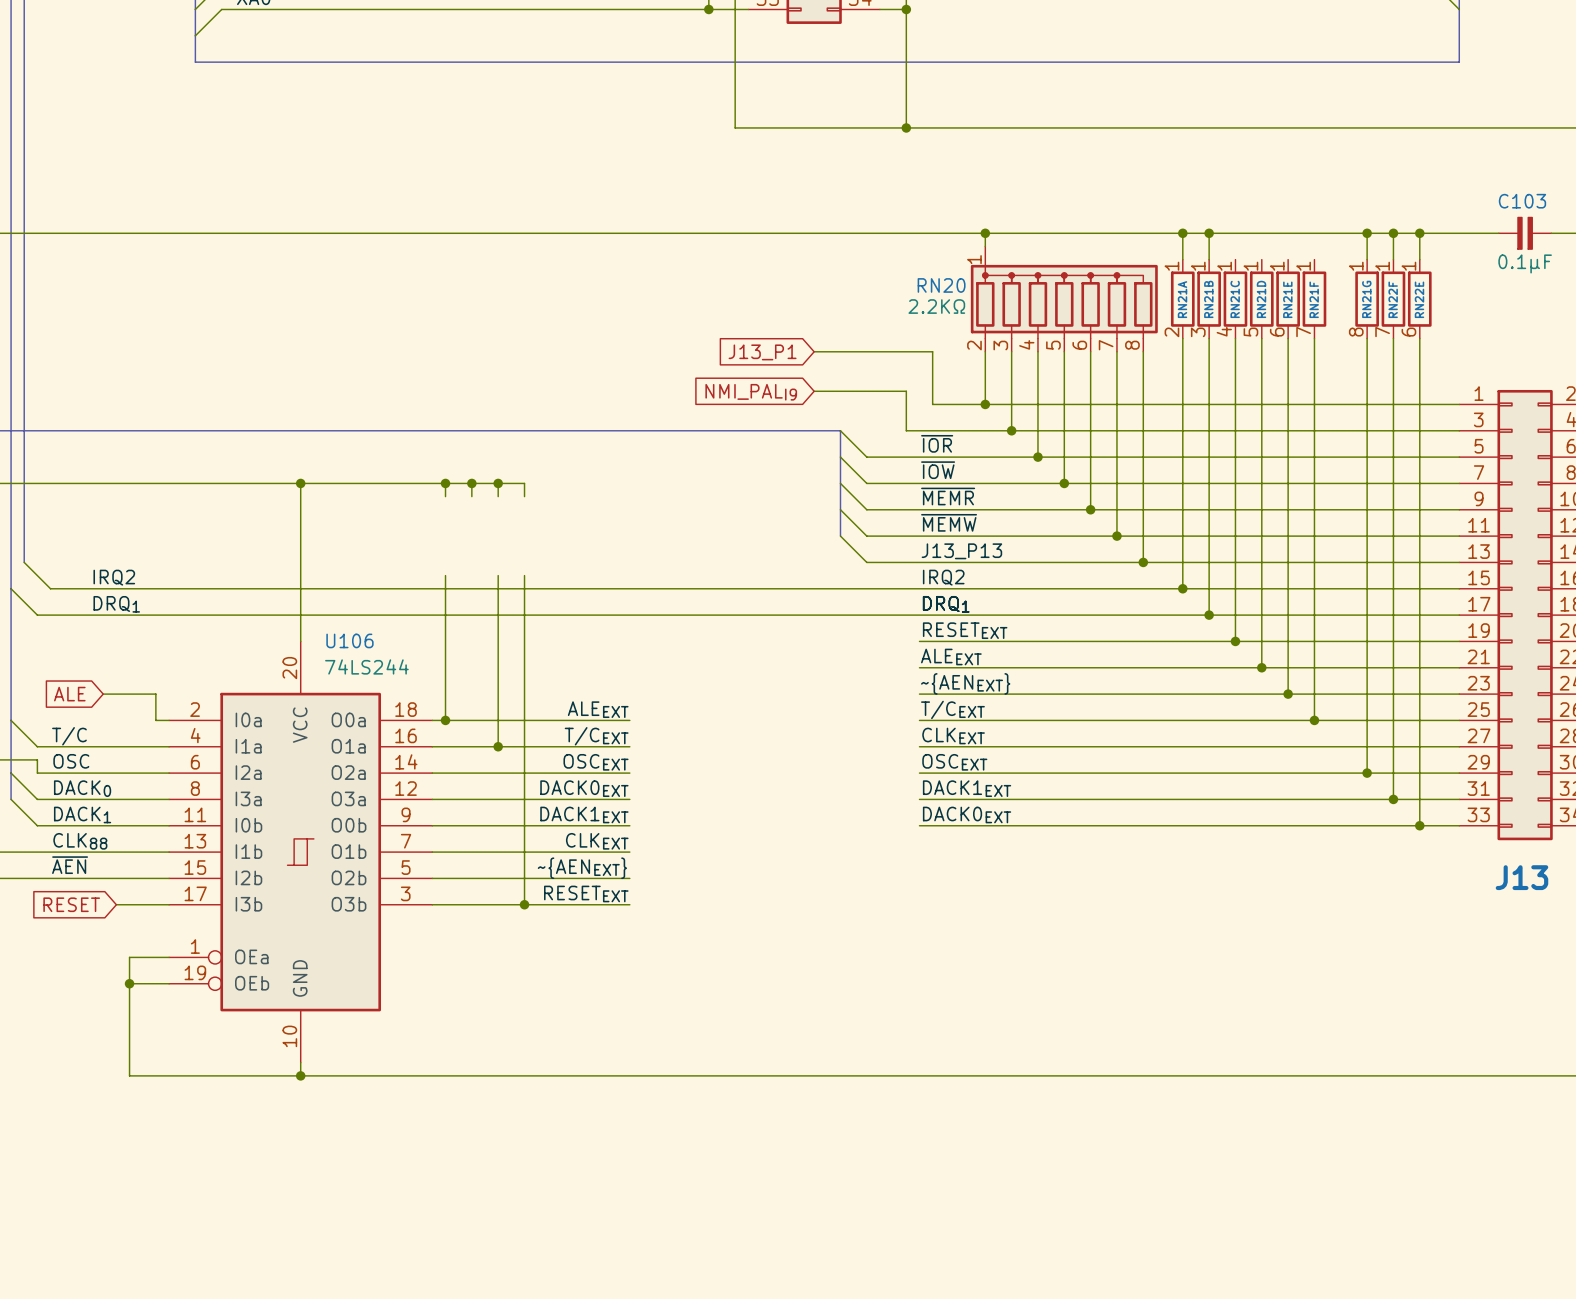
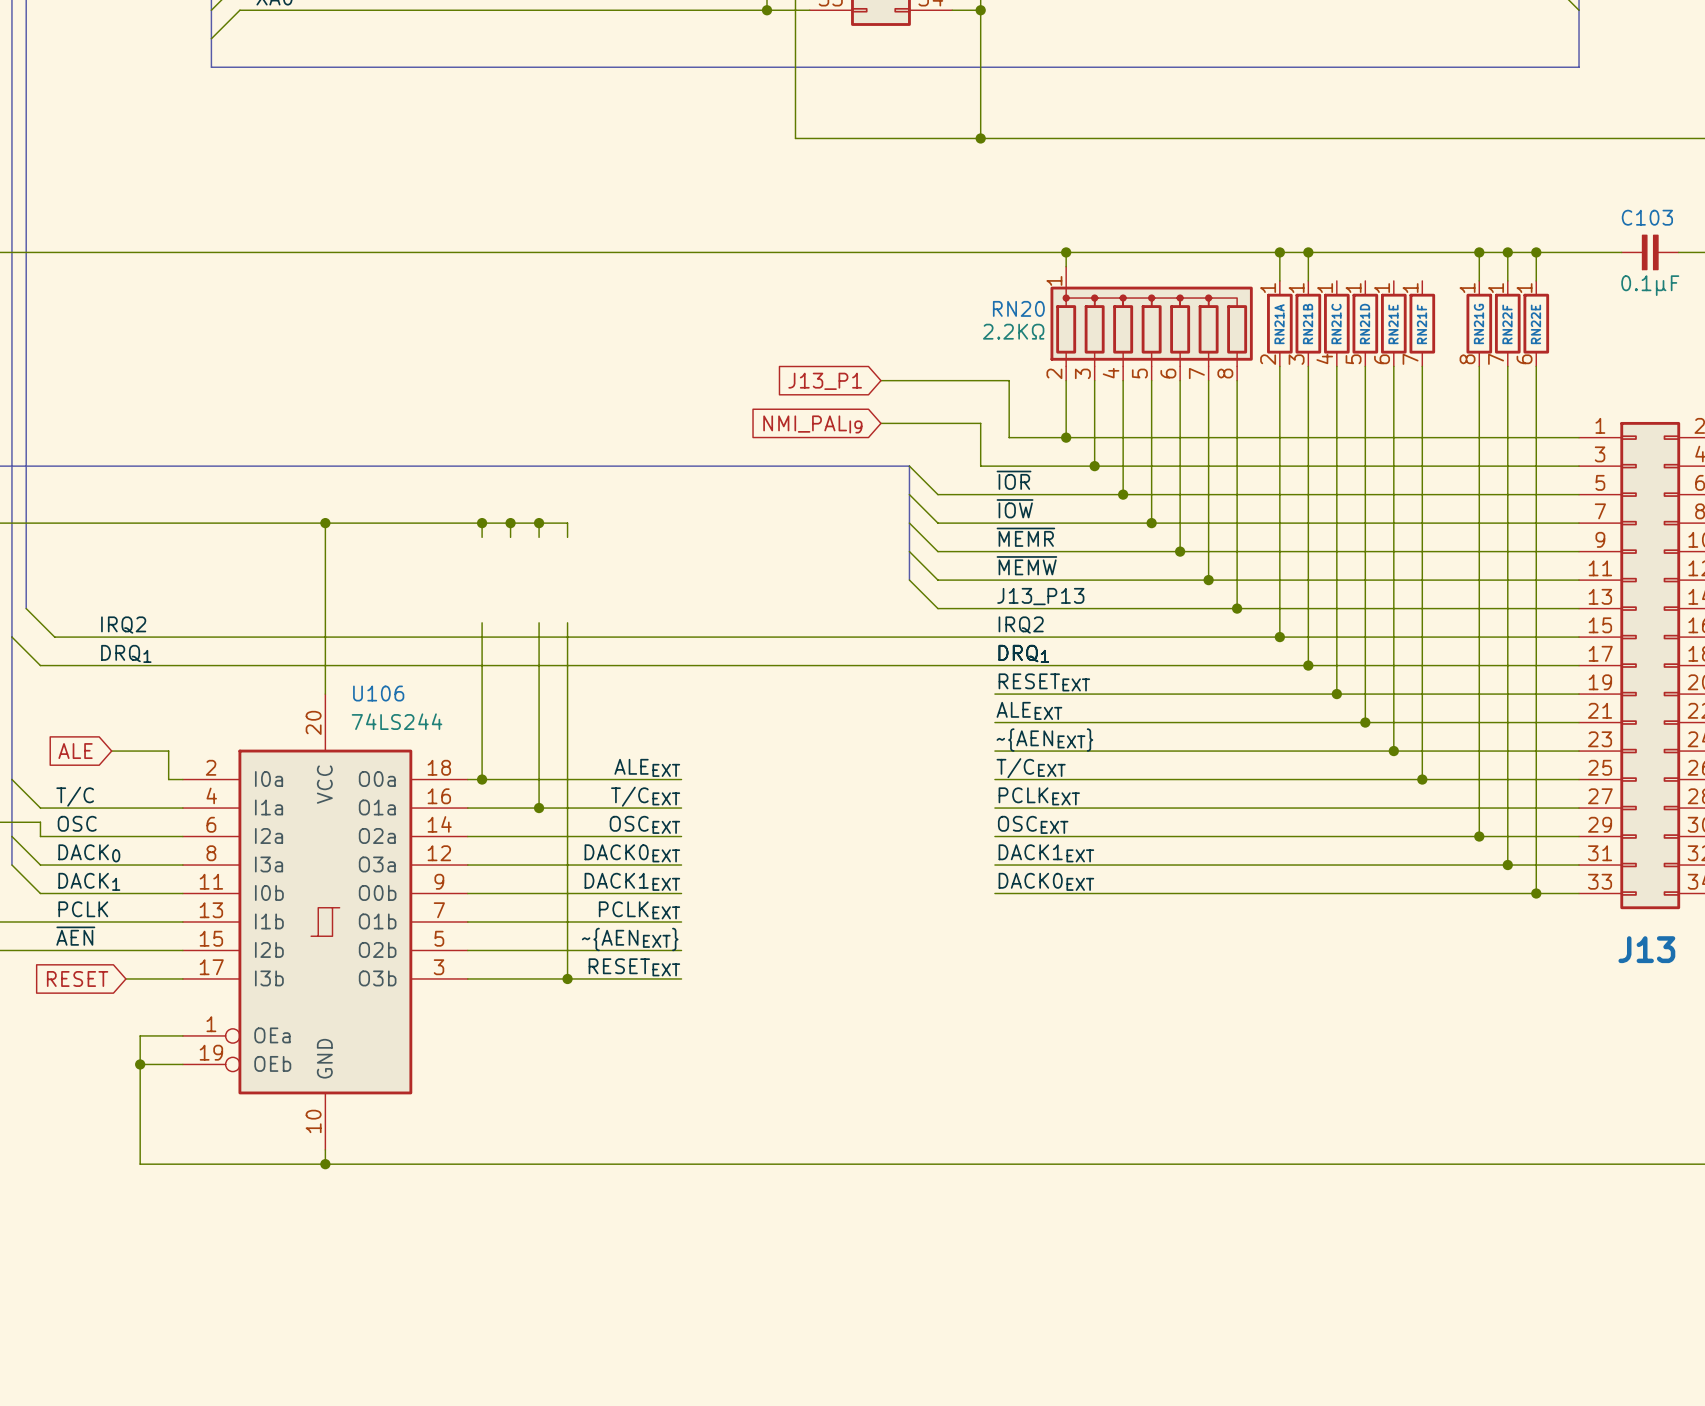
label: CLKEXT (953, 735) -> PCLKEXT (1039, 796)
label: CLK88 (80, 841) -> PCLK (83, 909)
label: CLKEXT (597, 841) -> PCLKEXT (639, 910)

